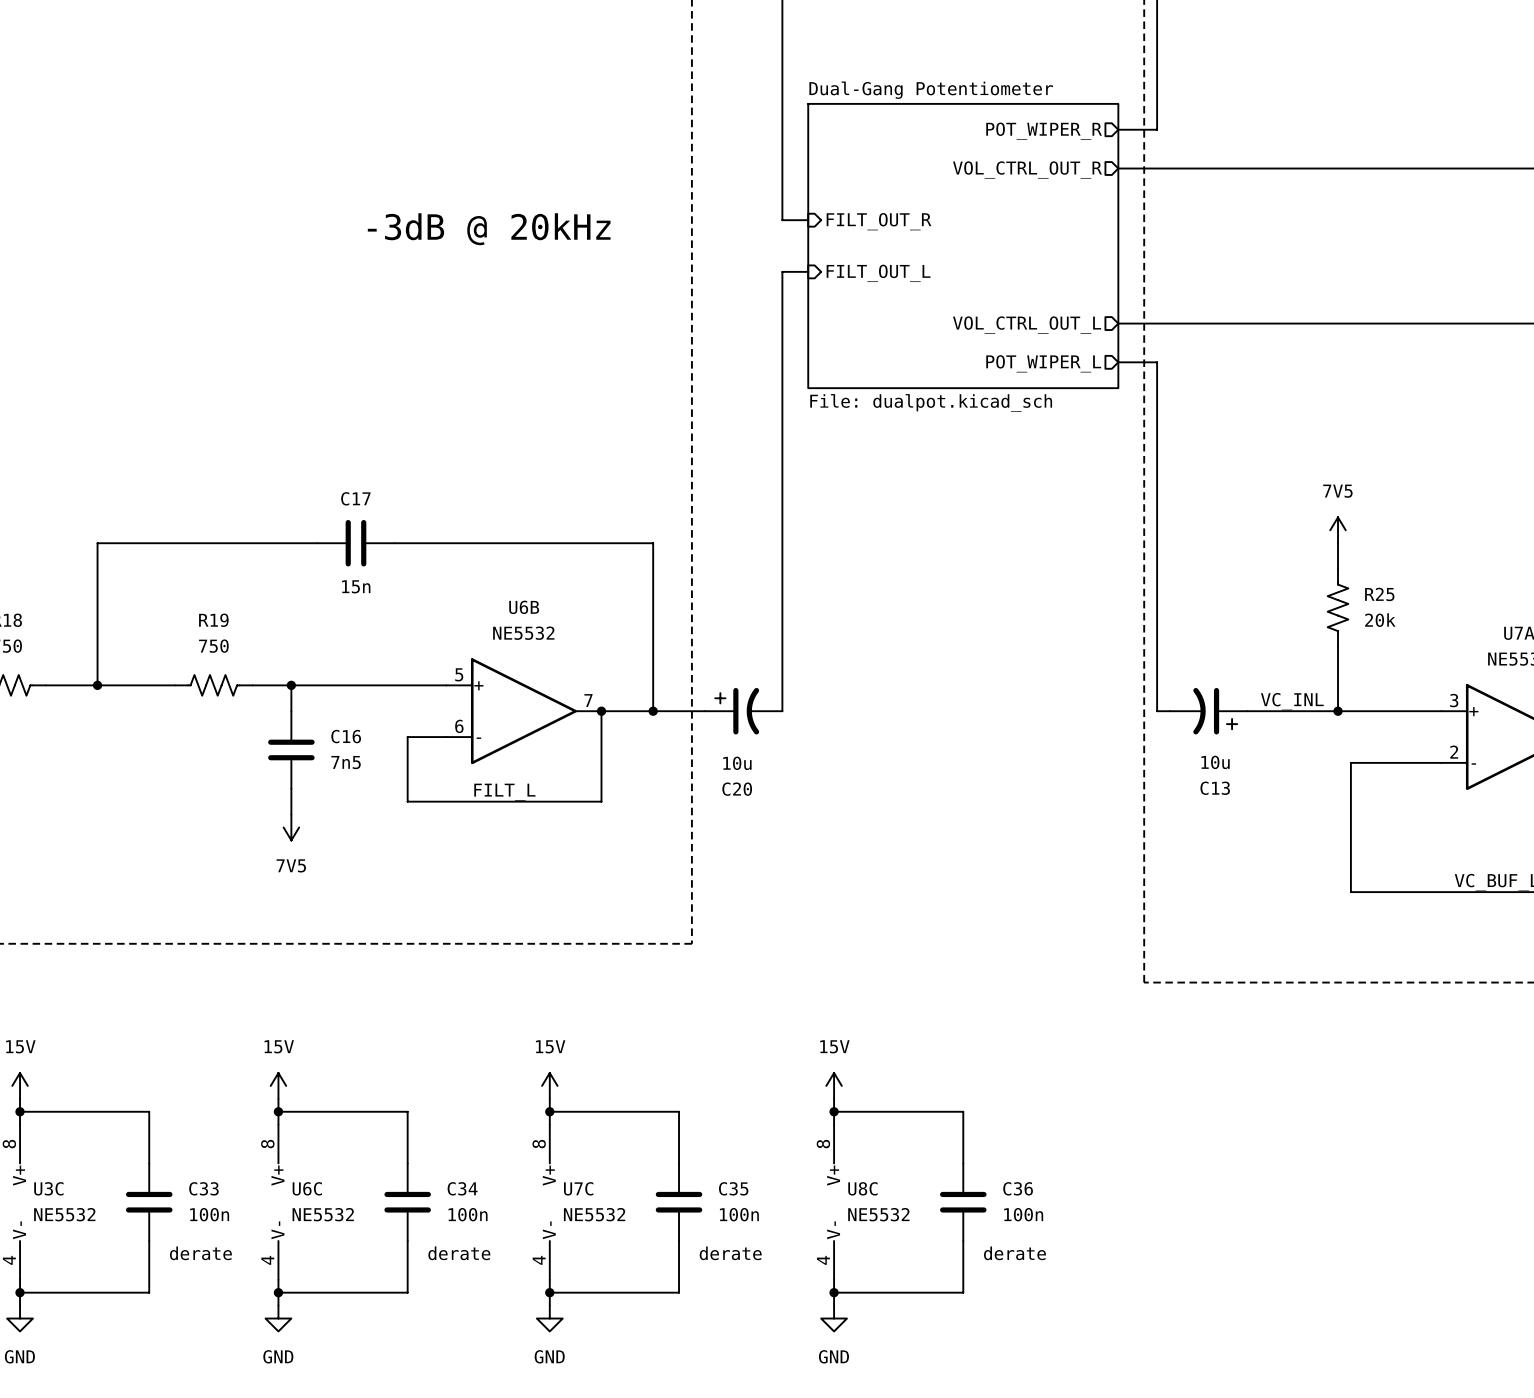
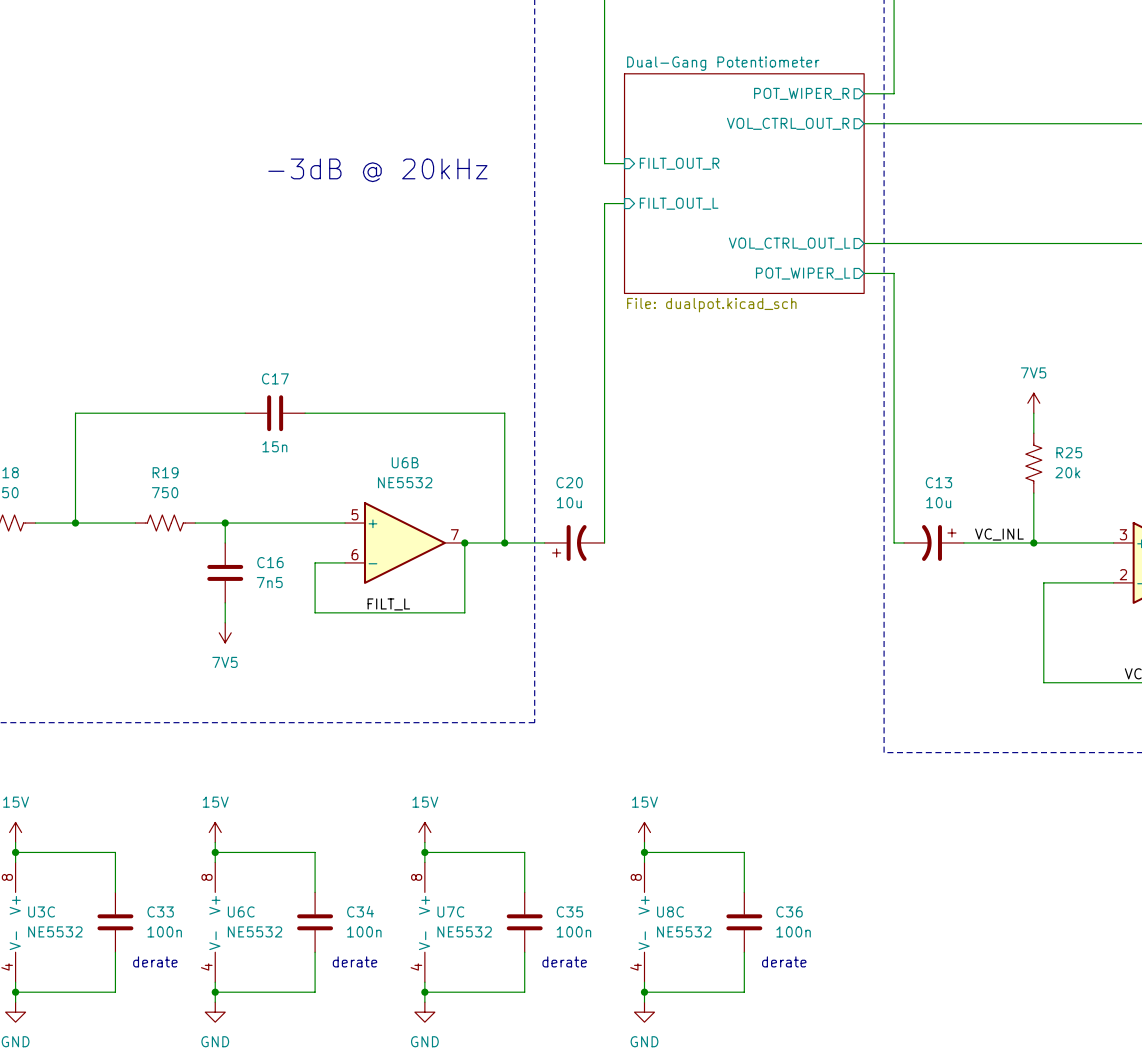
C20 flip: as is (737, 711) -> up-down (569, 542)
C13 flip: as is (1215, 711) -> up-down (938, 542)

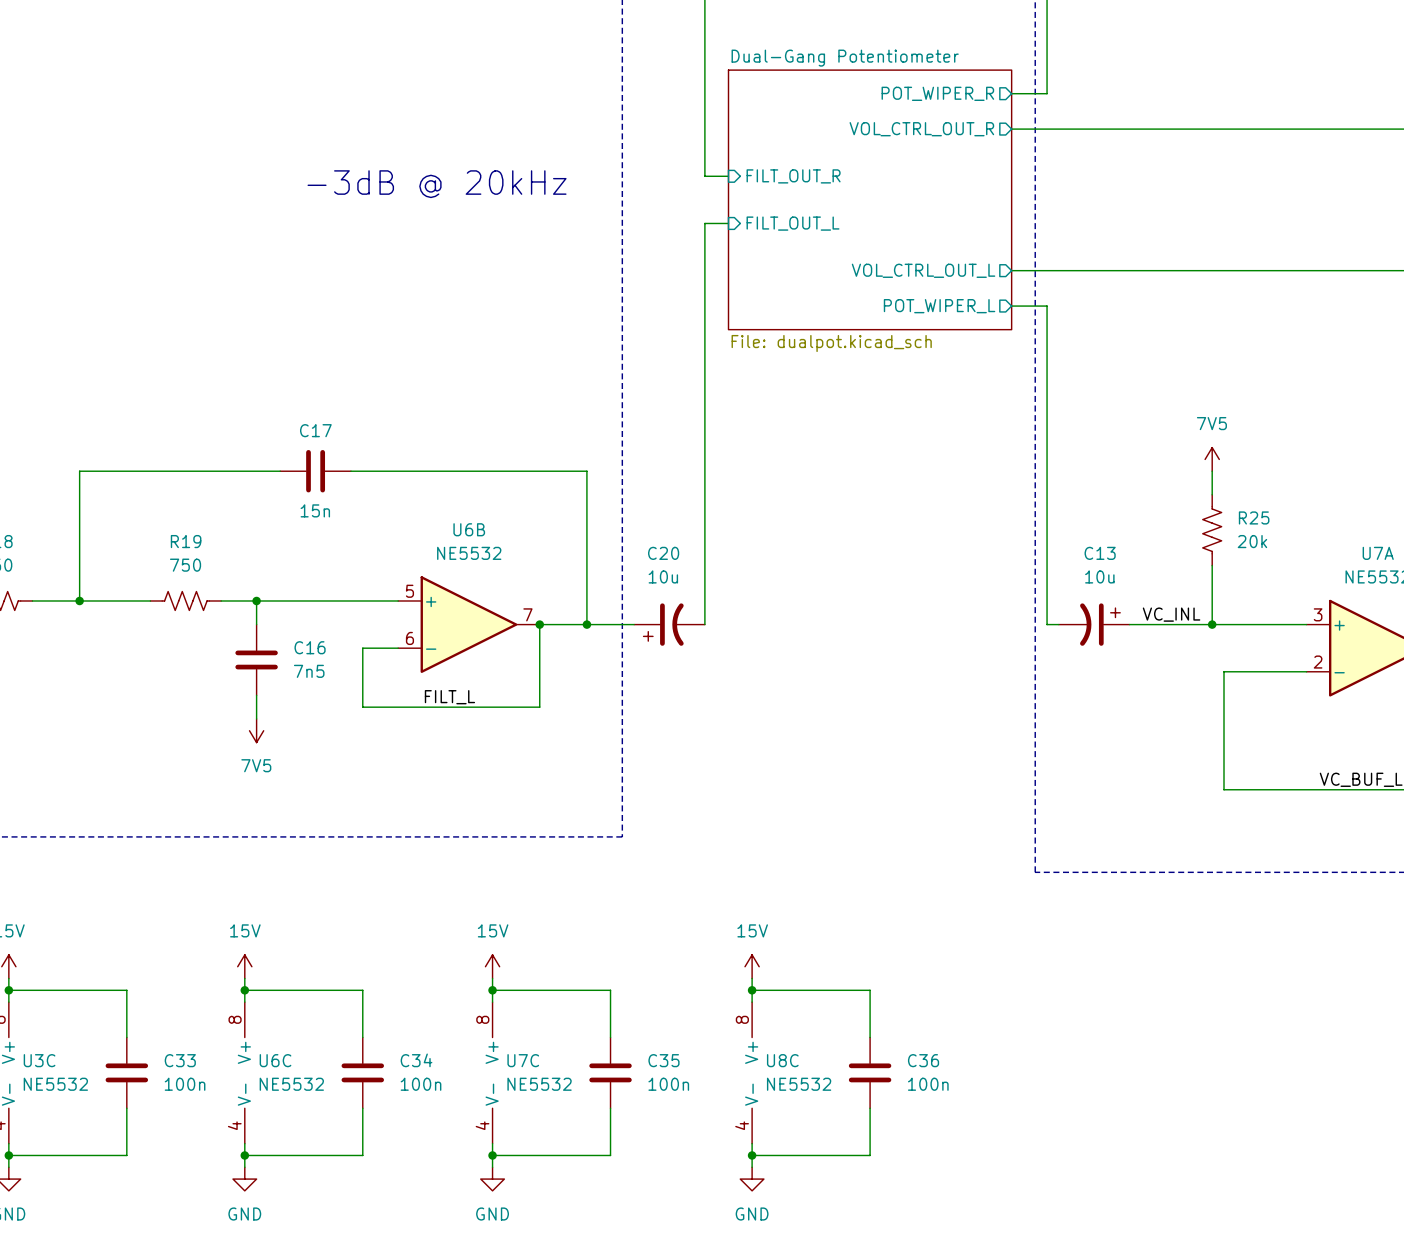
text: derate (155, 961) -> none
text: derate (355, 961) -> none
text: derate (564, 961) -> none
text: derate (784, 961) -> none

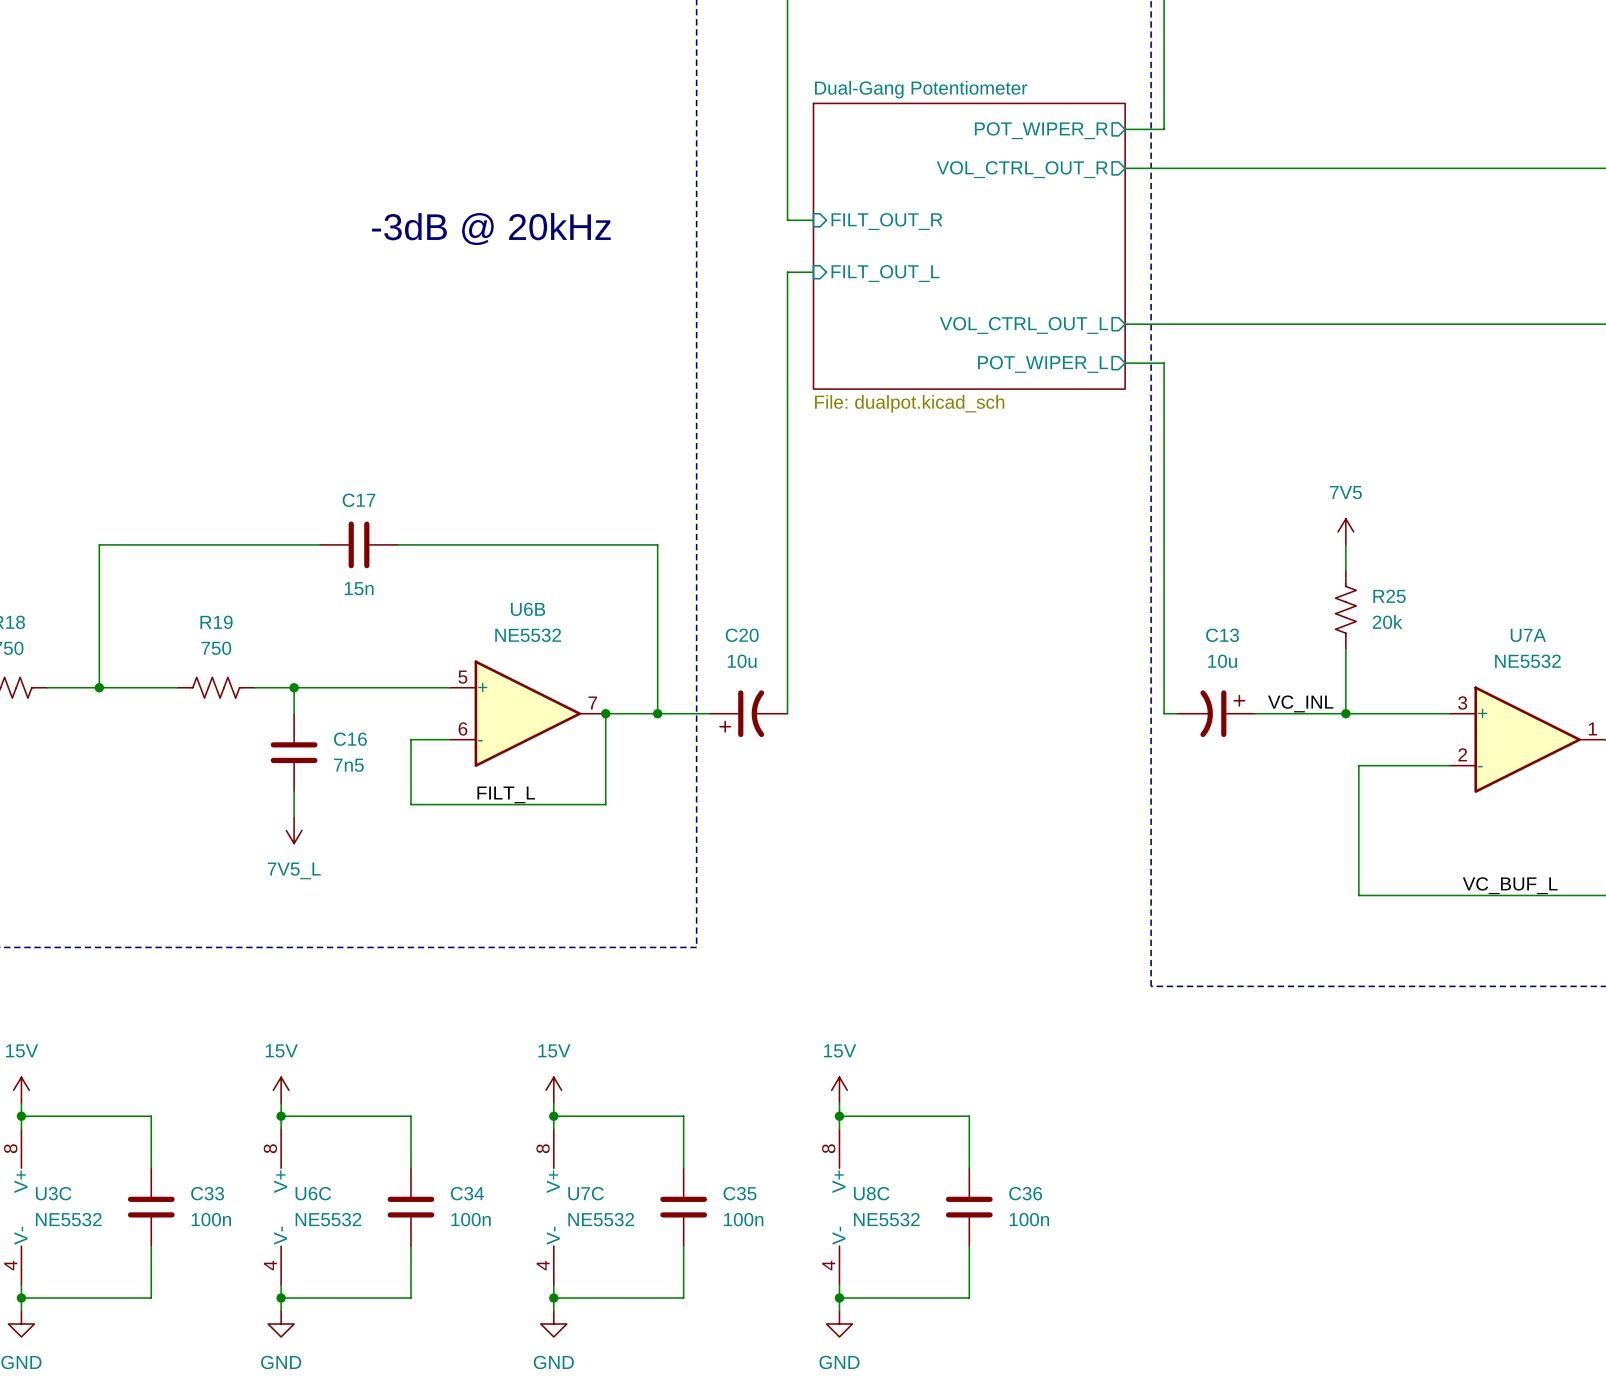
power symbol: 7V5 (256, 730) -> 7V5_L (294, 830)

